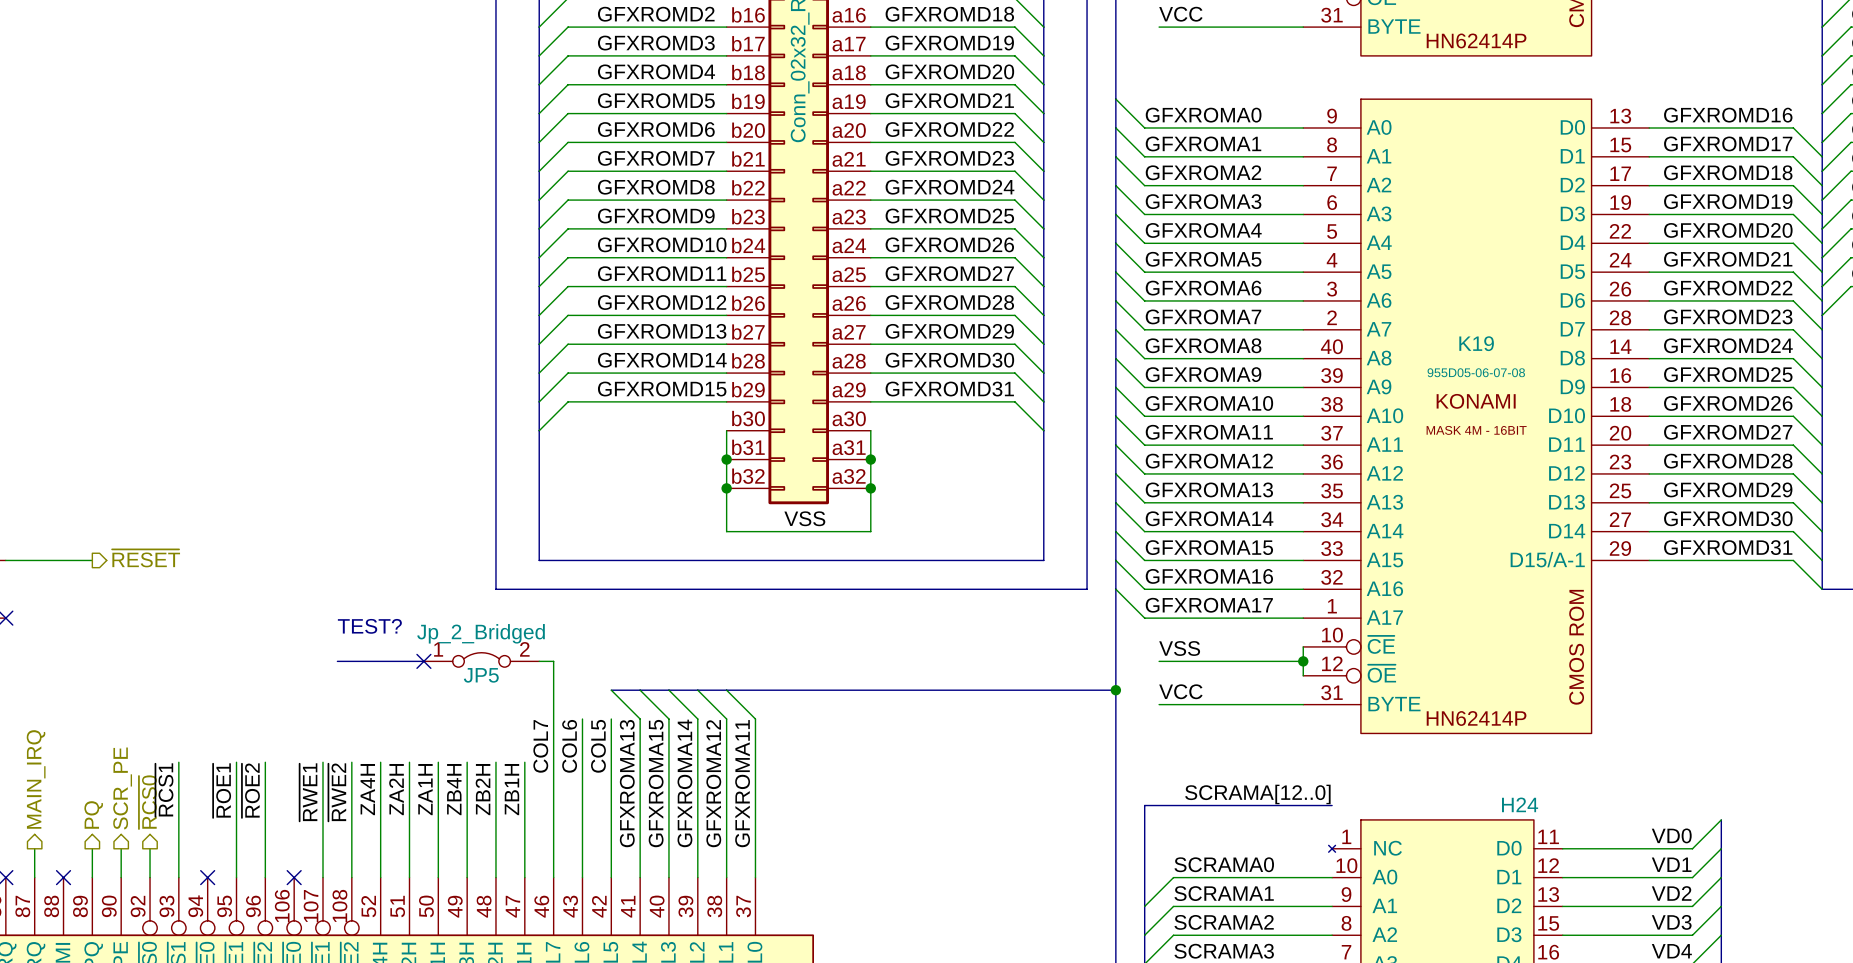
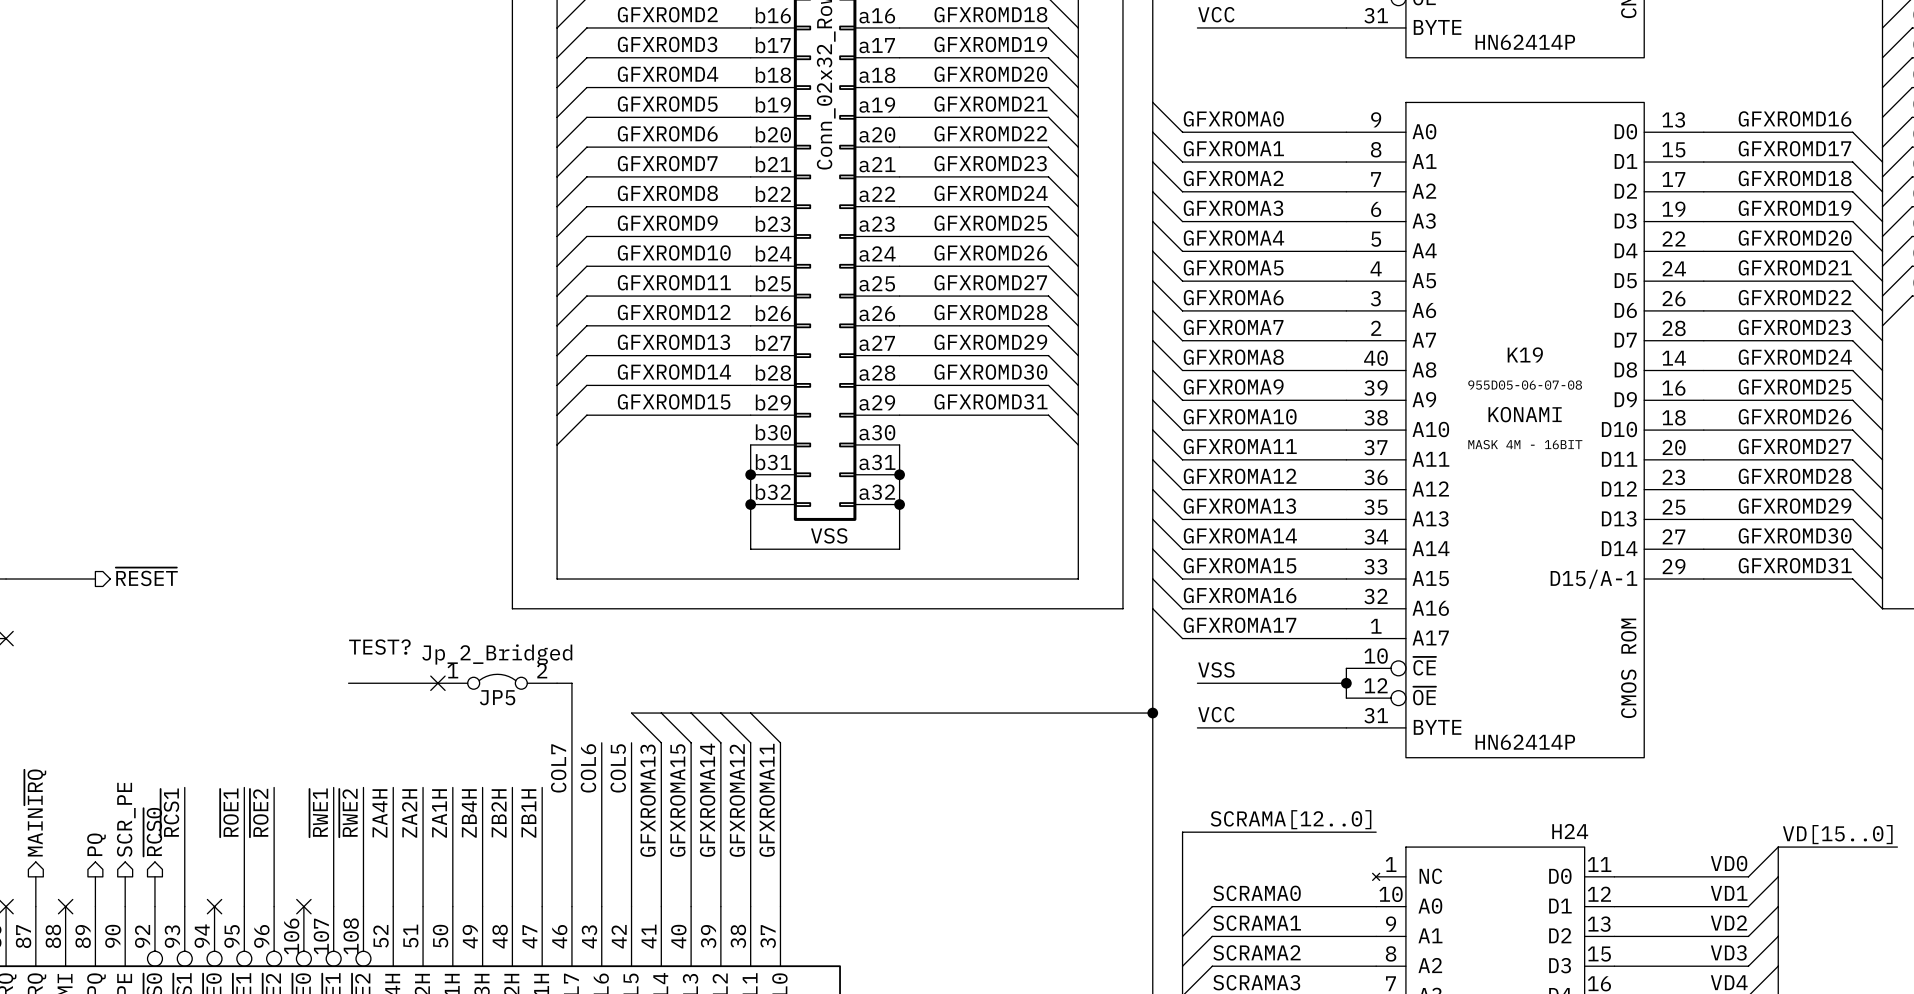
hierarchical label: MAIN_IRQ (36, 779) -> MAIN~{IRQ} (35, 813)
label: none -> VD[15..0] (1837, 834)
bus: none -> (1778, 847) (1897, 847)

